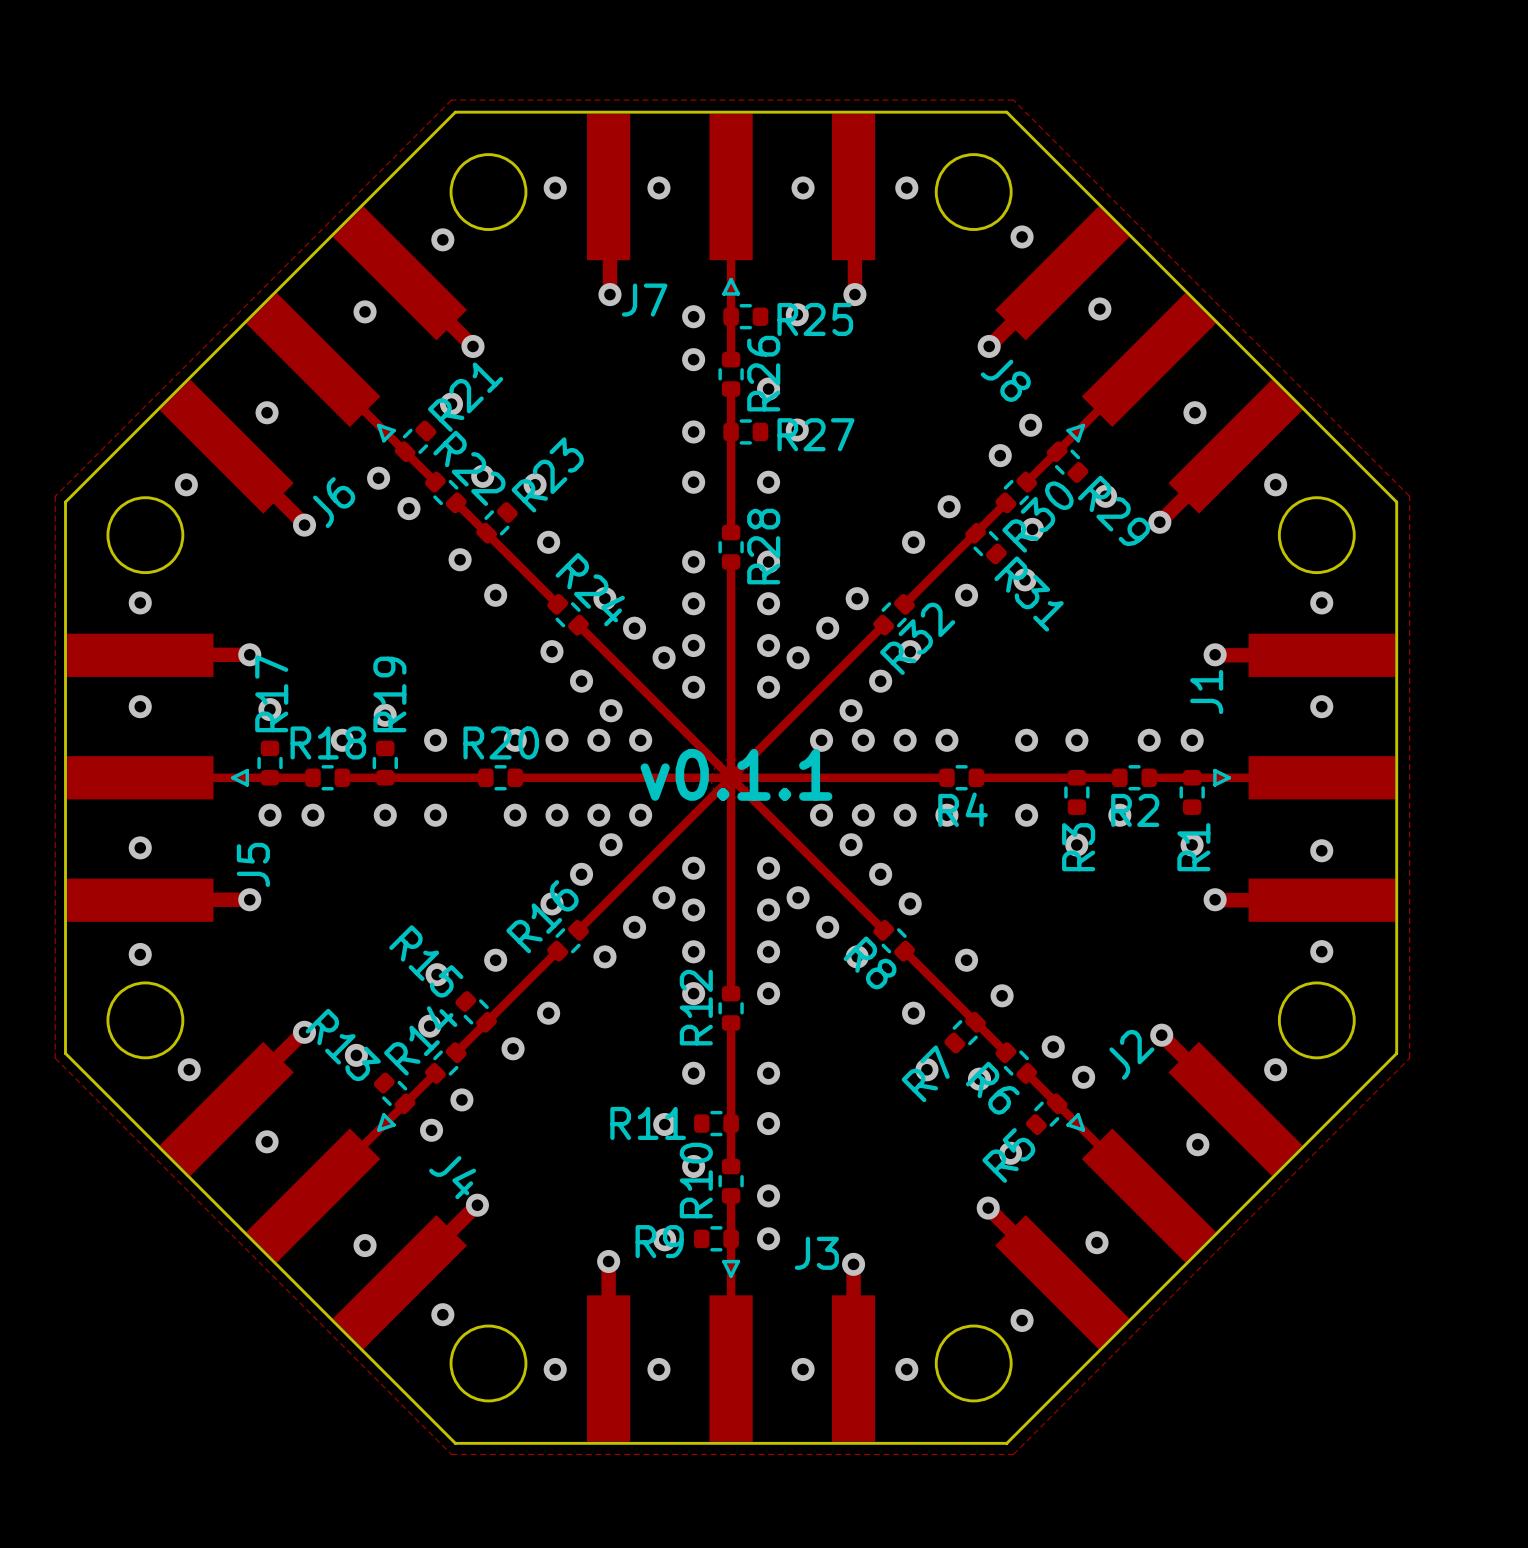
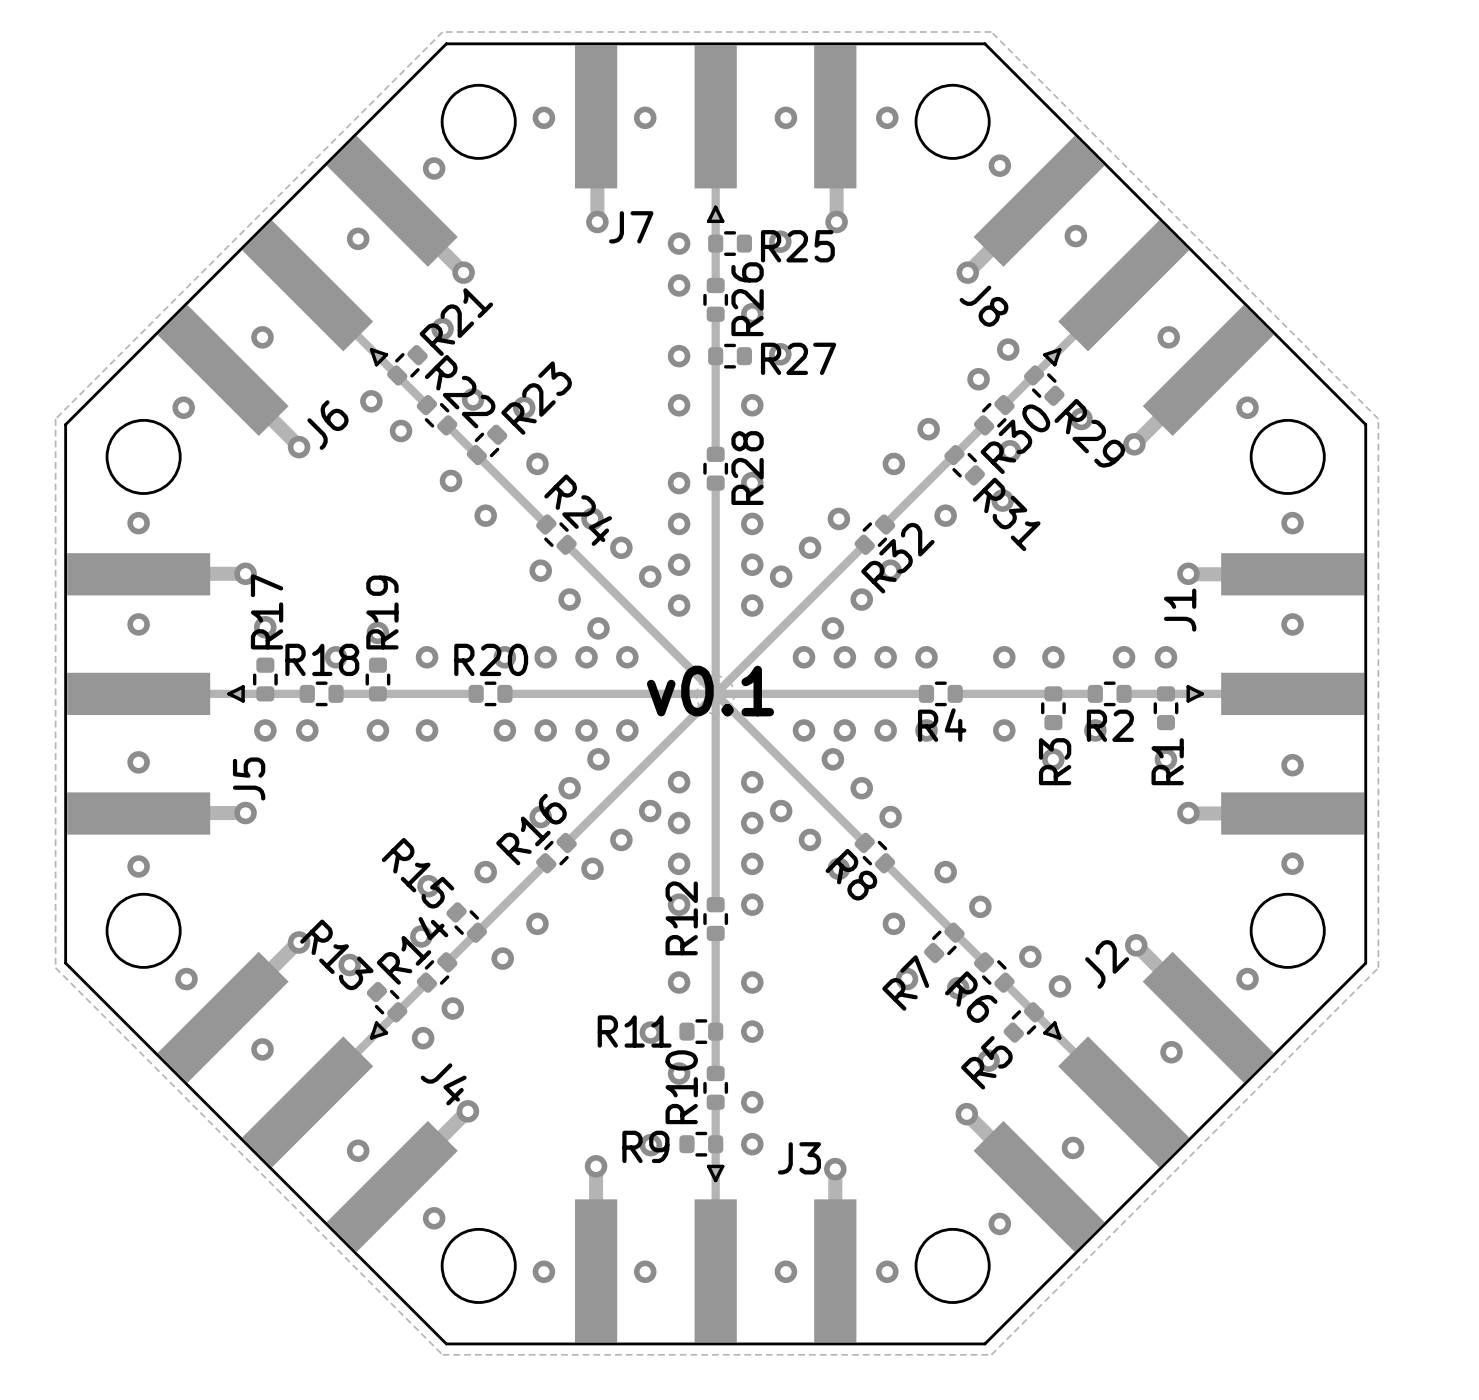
text: v0.1.1 (736, 774) -> v0.1 (710, 691)

